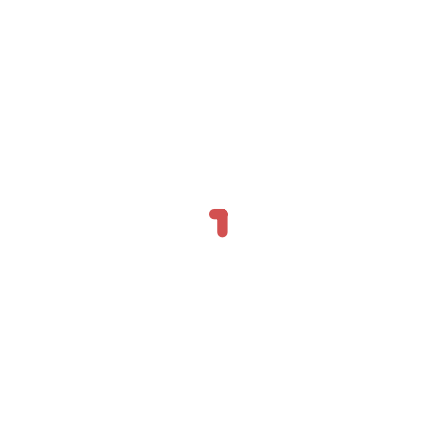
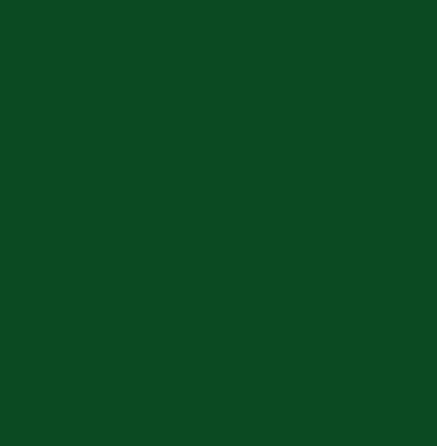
track: (214, 214) (222, 214) (222, 232) -> none

